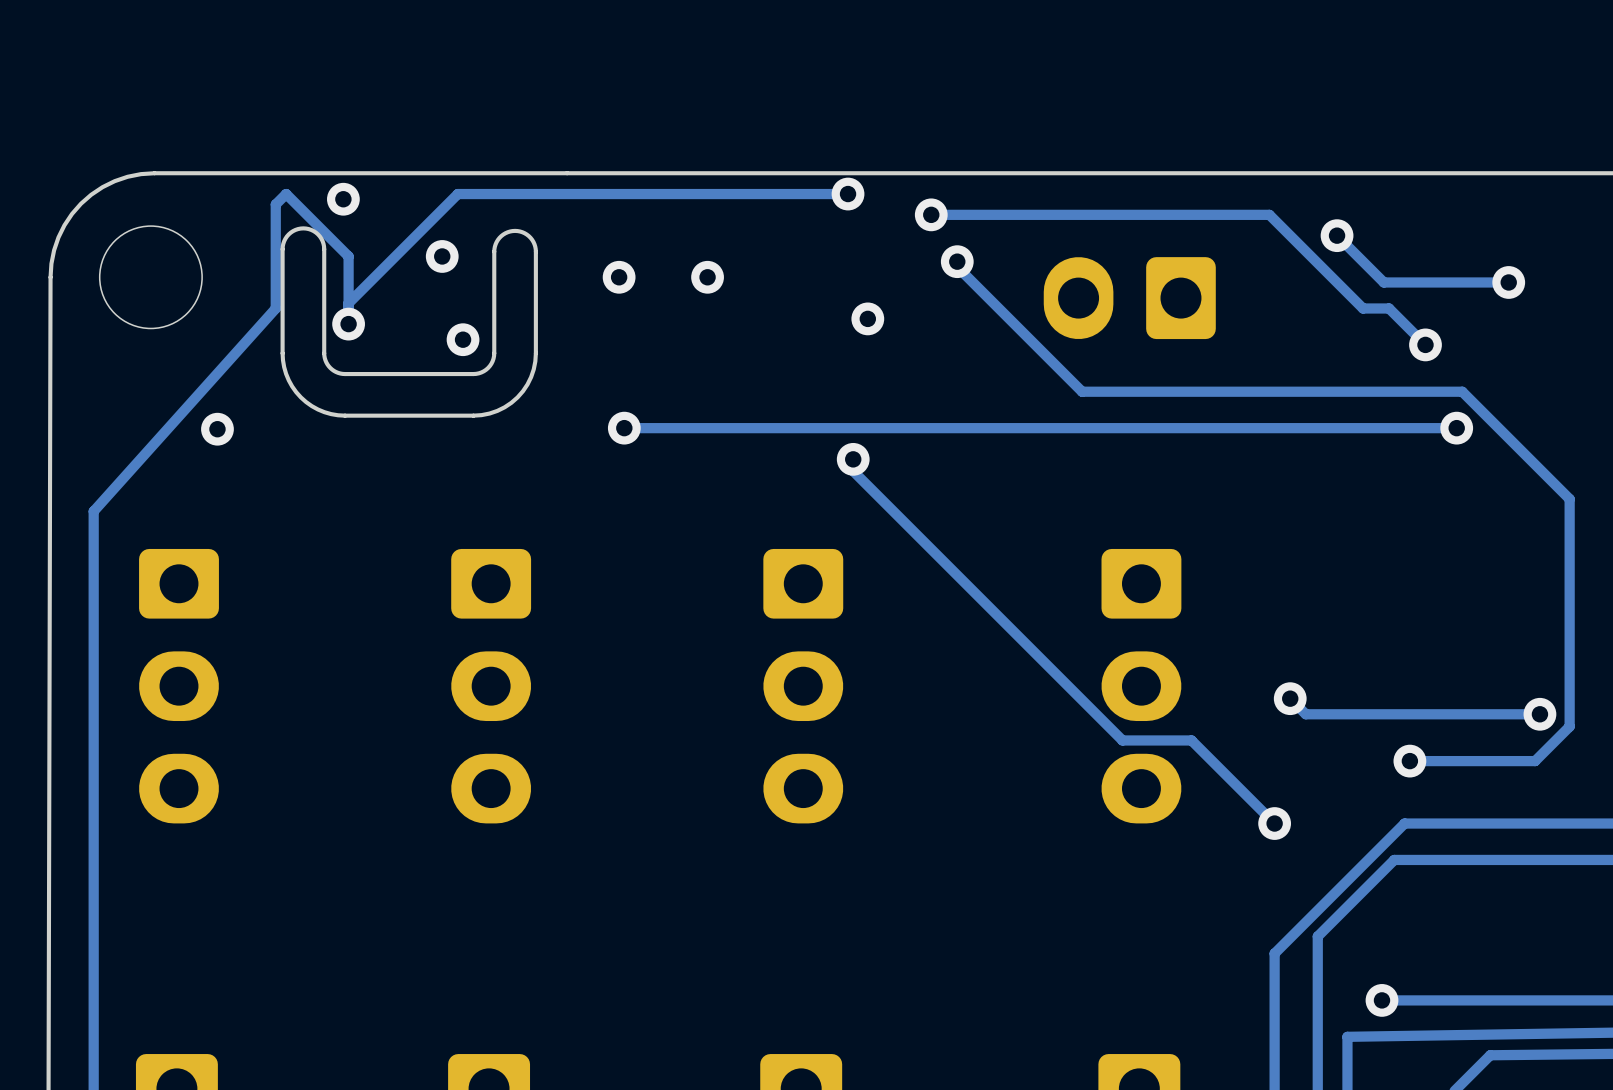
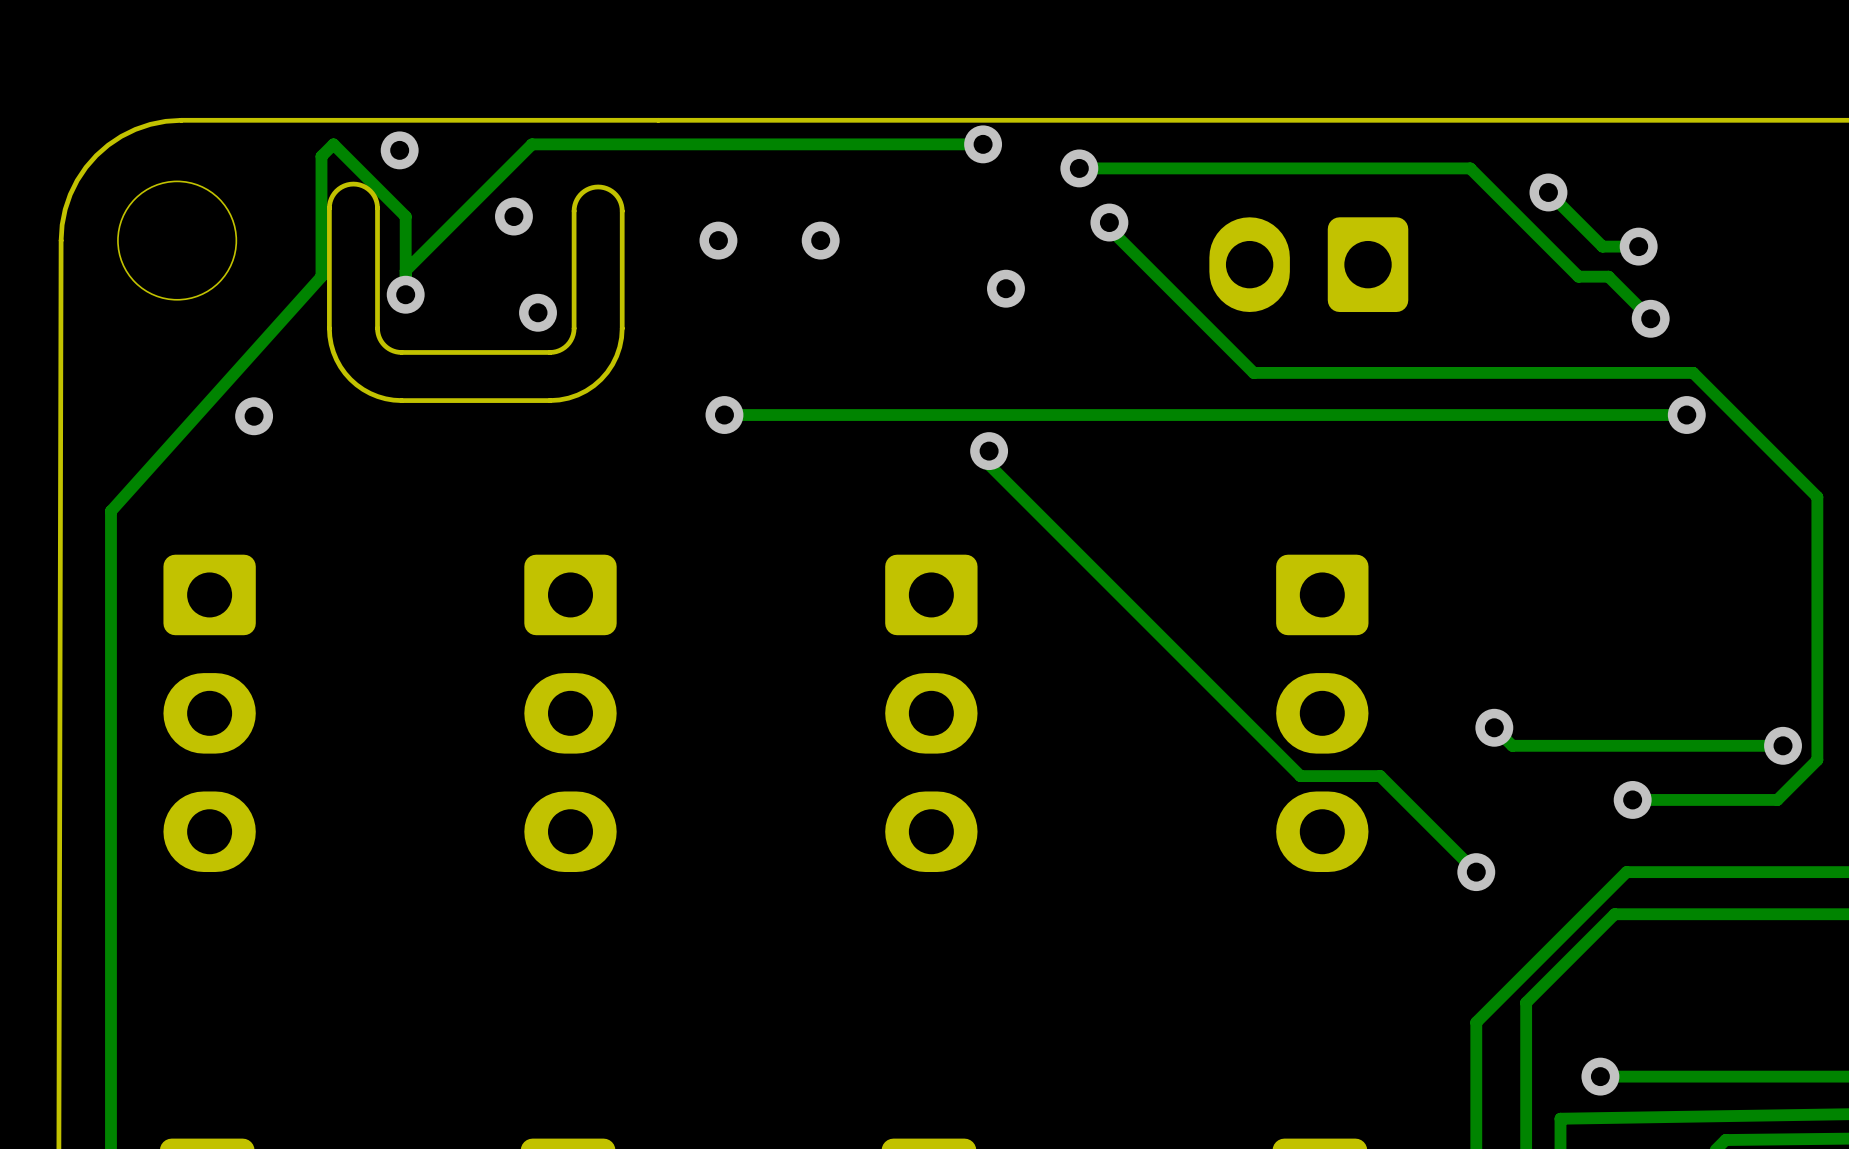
track: (1508, 282) (1415, 282) -> none
via position: (1508, 282) -> (1638, 246)

